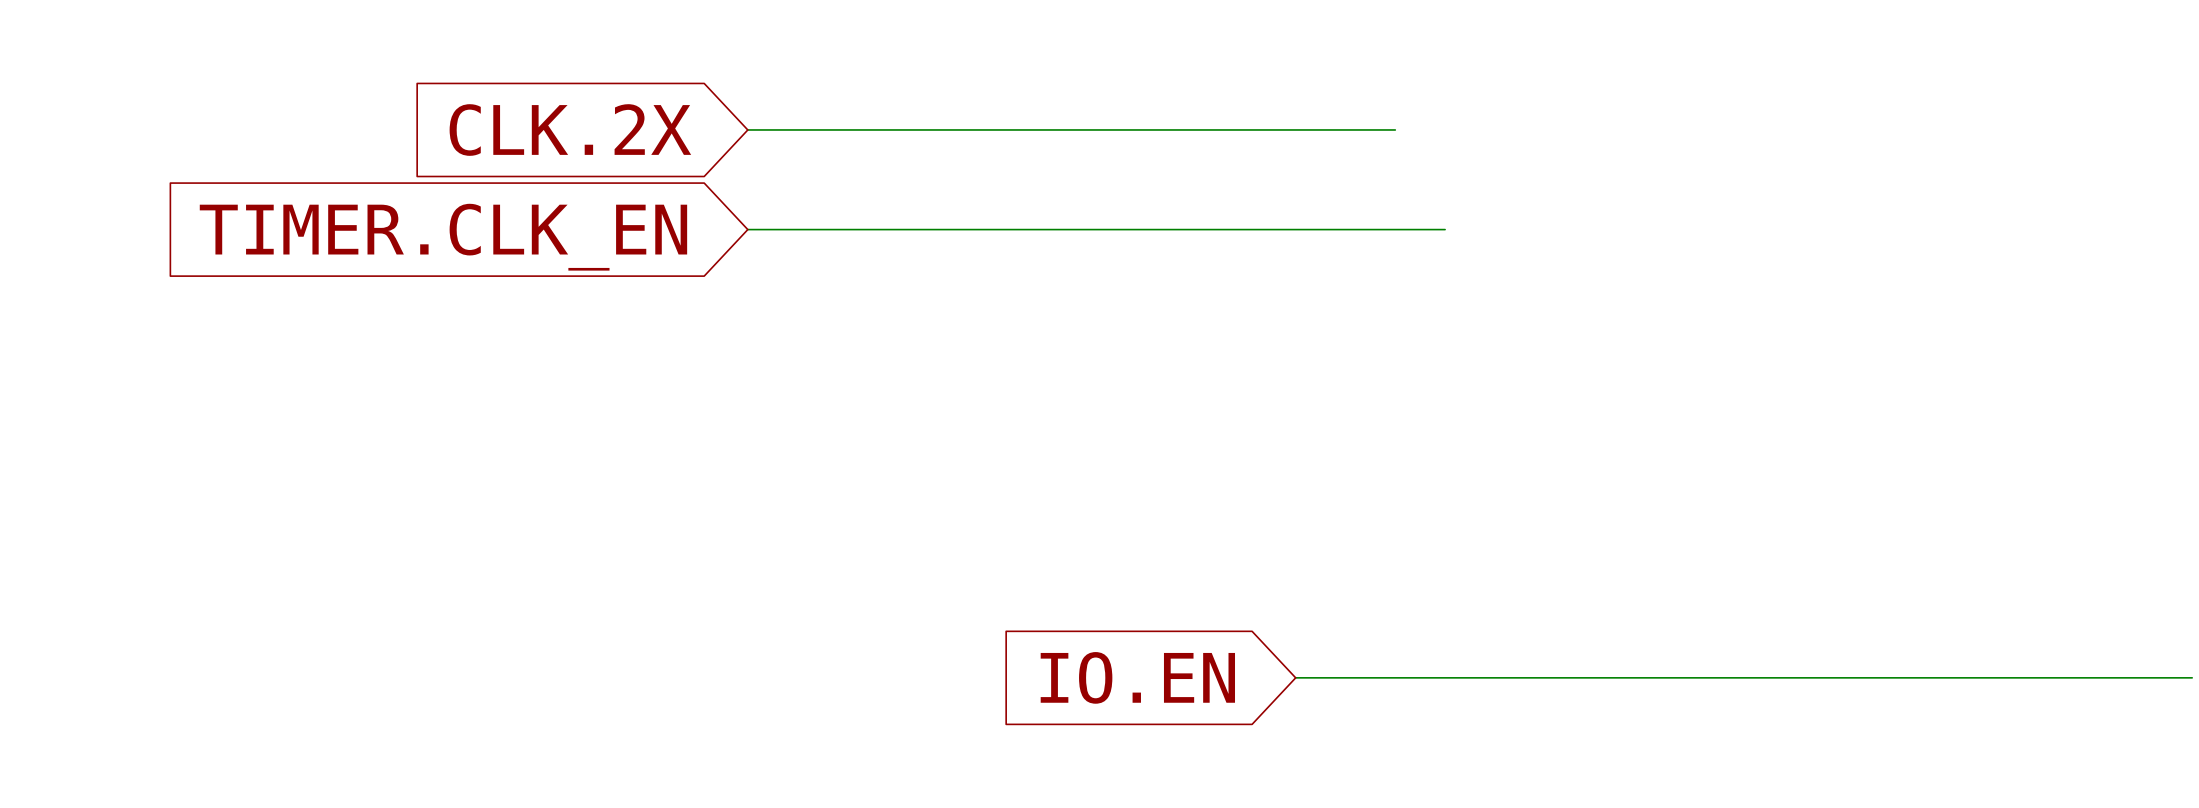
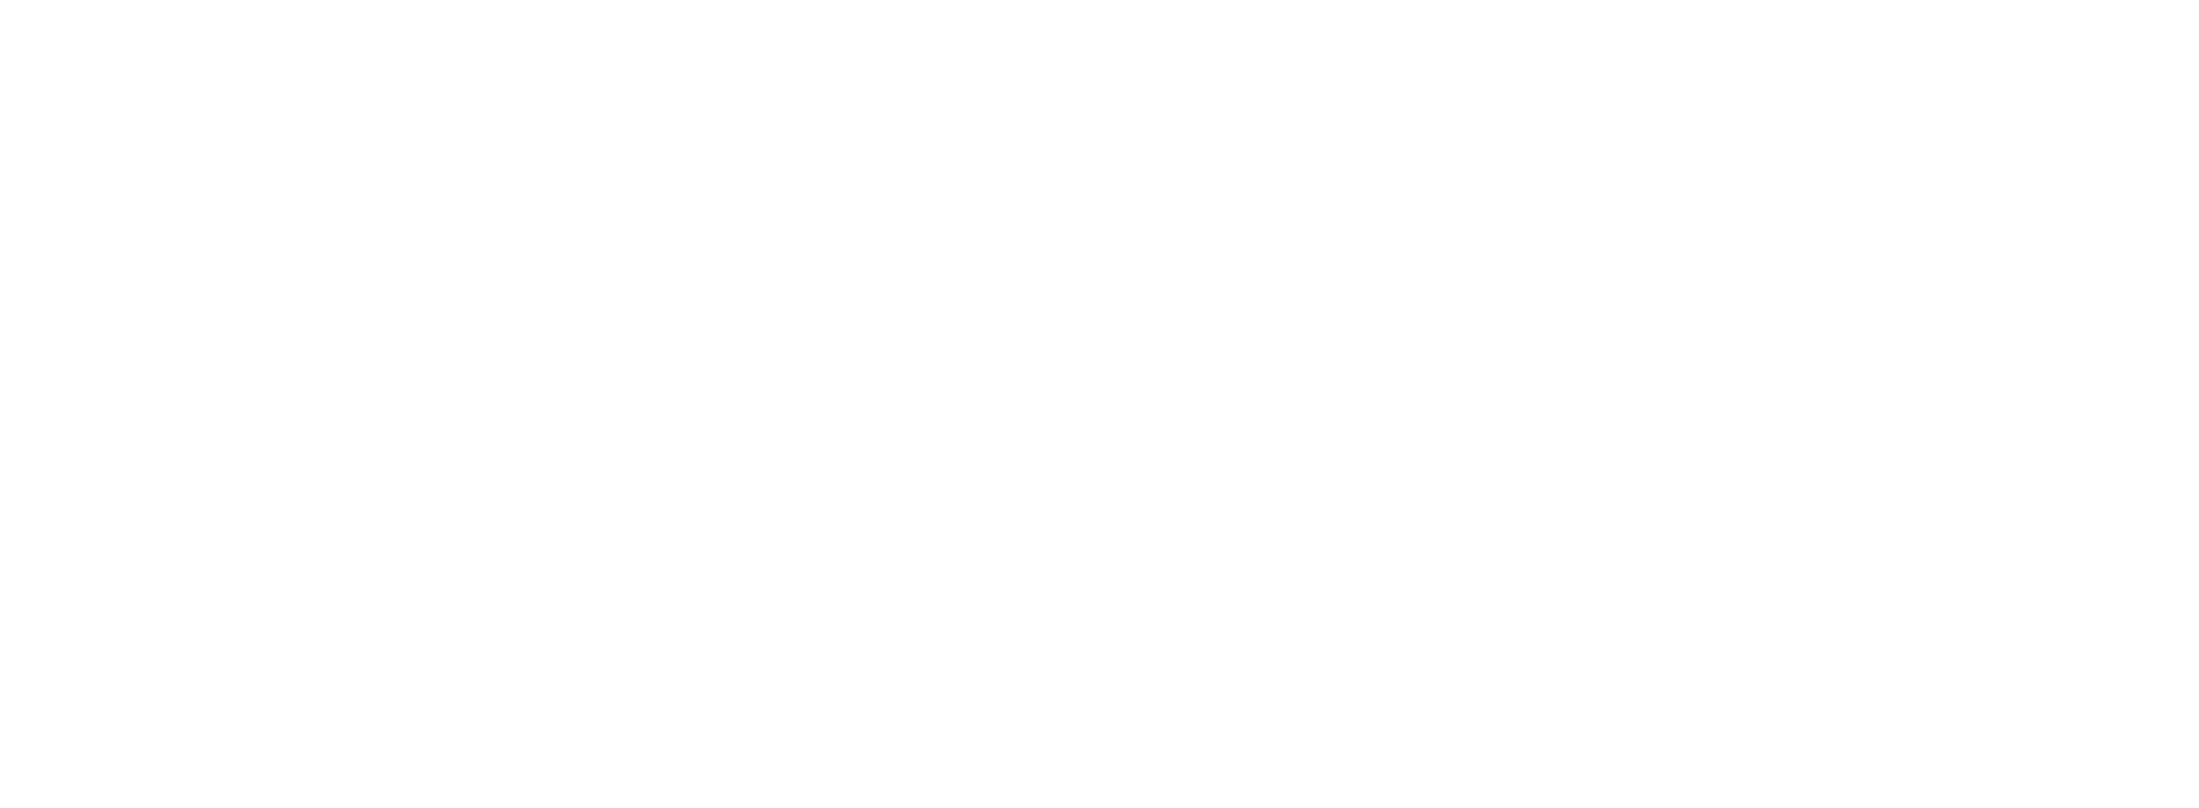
wire: (747, 129) (1395, 129) -> none
global label: CLK.2X (570, 130) -> none
wire: (747, 229) (1445, 229) -> none
global label: TIMER.CLK_EN (443, 237) -> none
global label: IO.EN (1137, 677) -> none
wire: (1295, 677) (2192, 677) -> none

